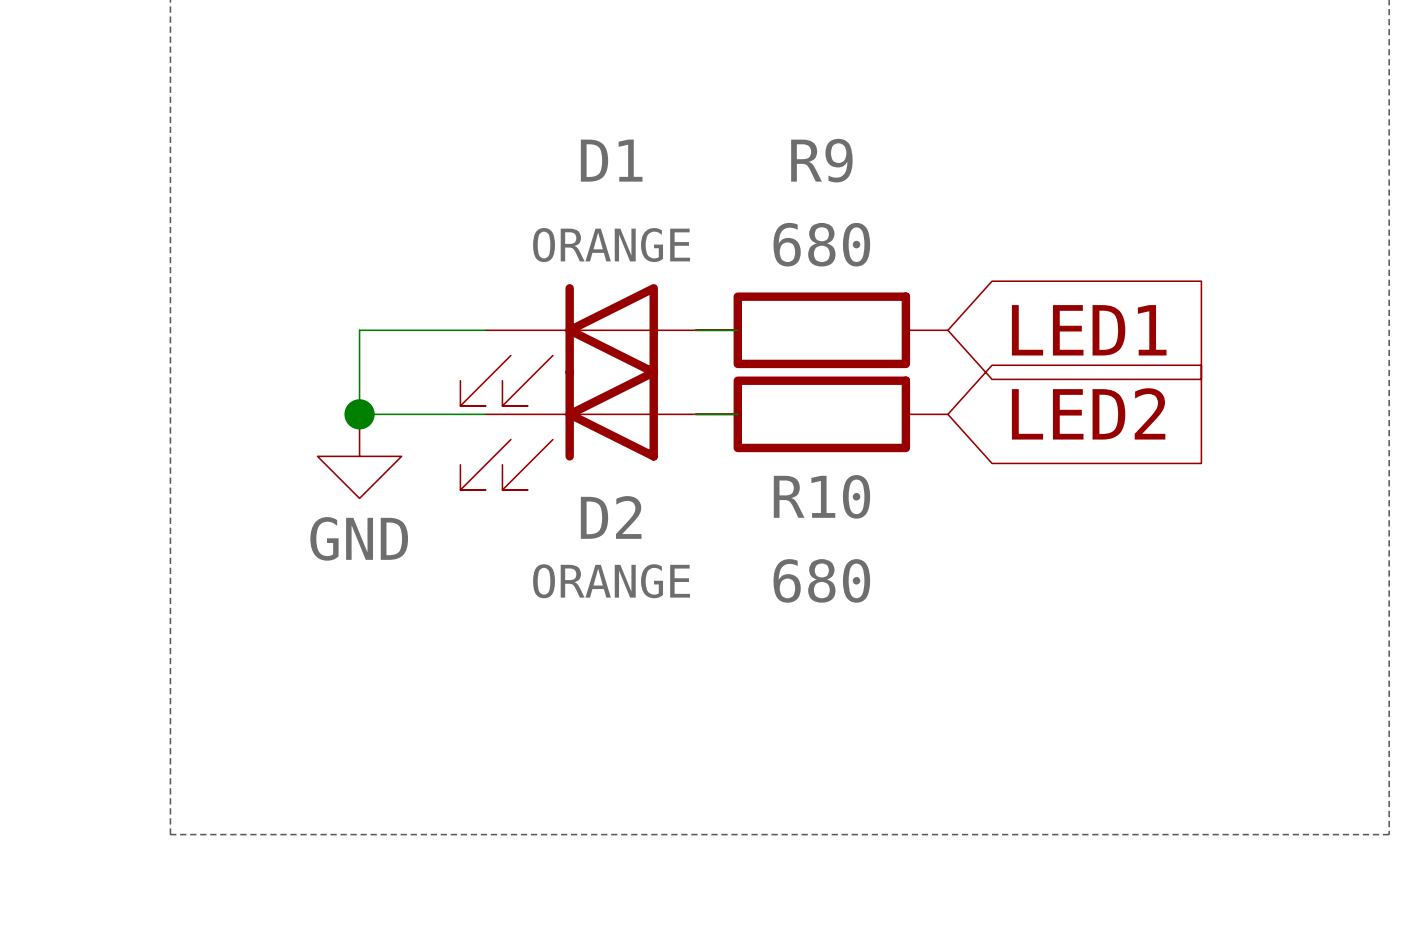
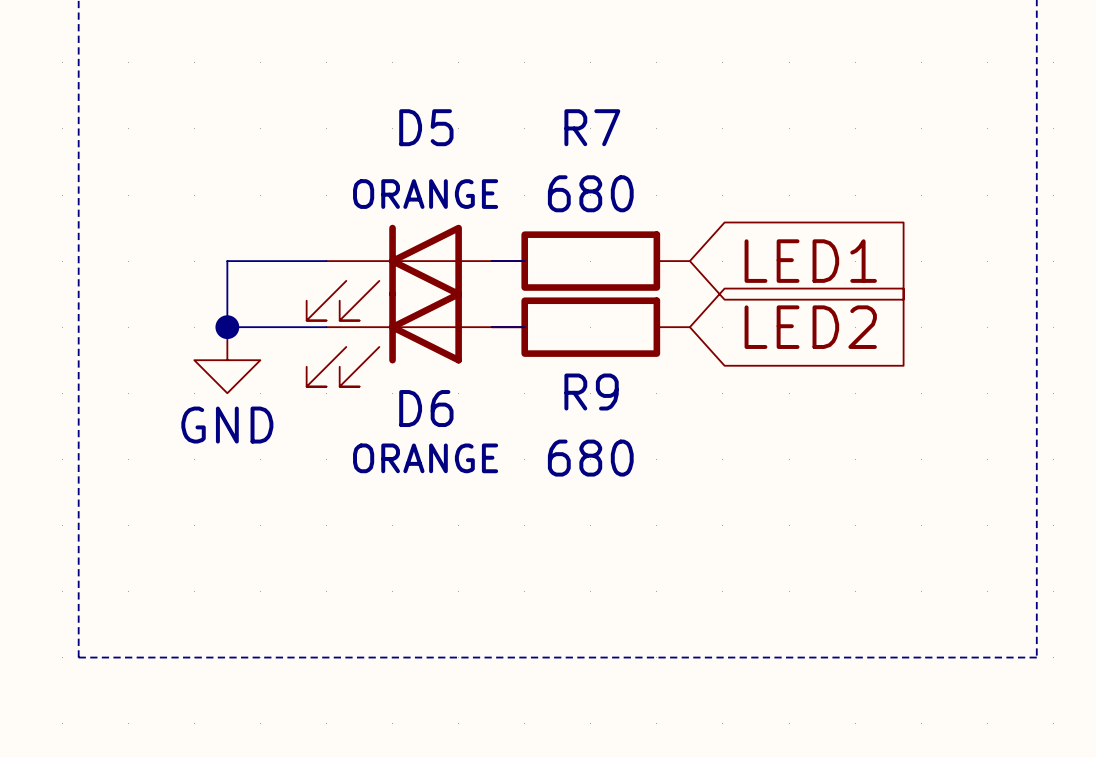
D1 name: D1 (611, 160) -> D5 (426, 127)
R9 name: R9 (821, 160) -> R7 (592, 127)
R10 name: R10 (821, 496) -> R9 (591, 392)
D2 name: D2 (611, 517) -> D6 (426, 408)

